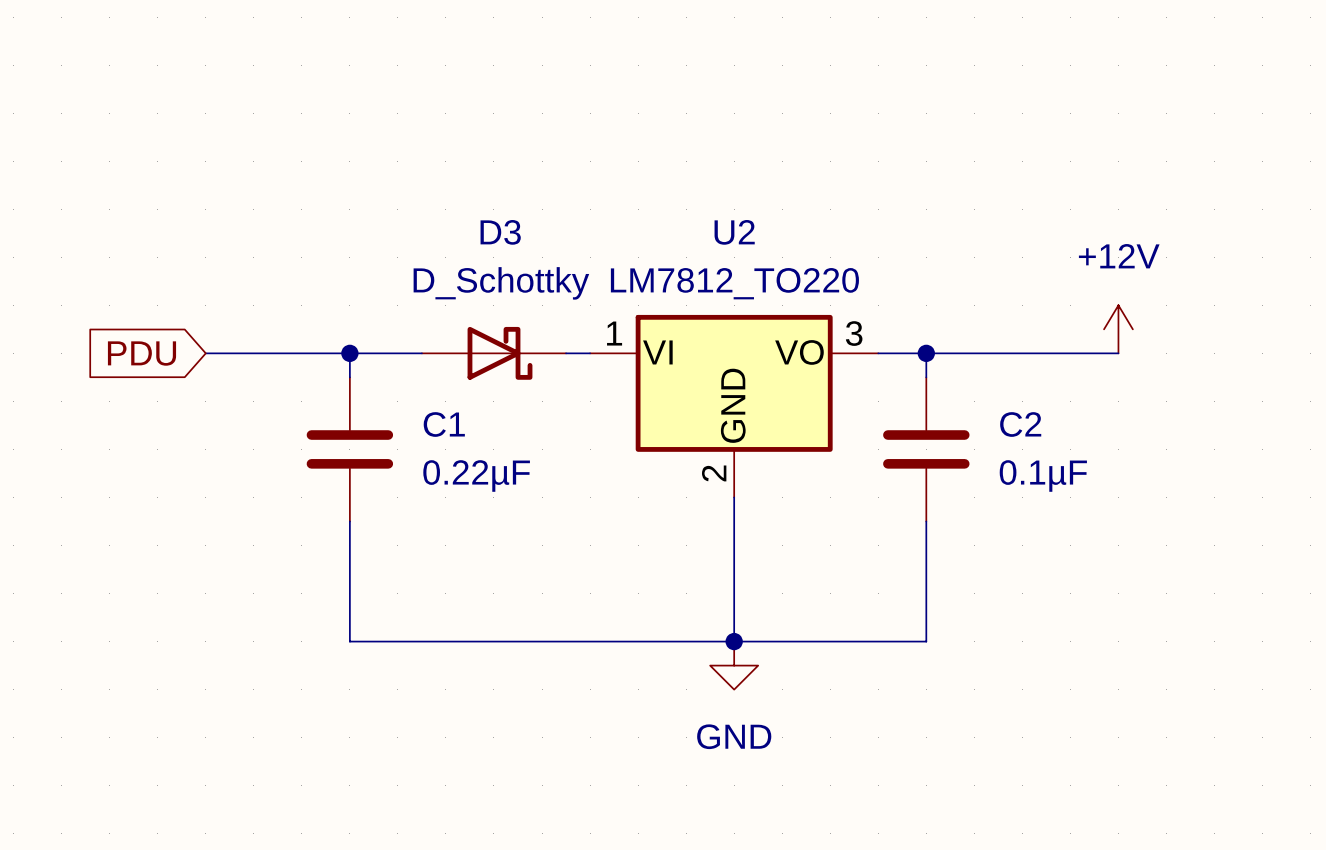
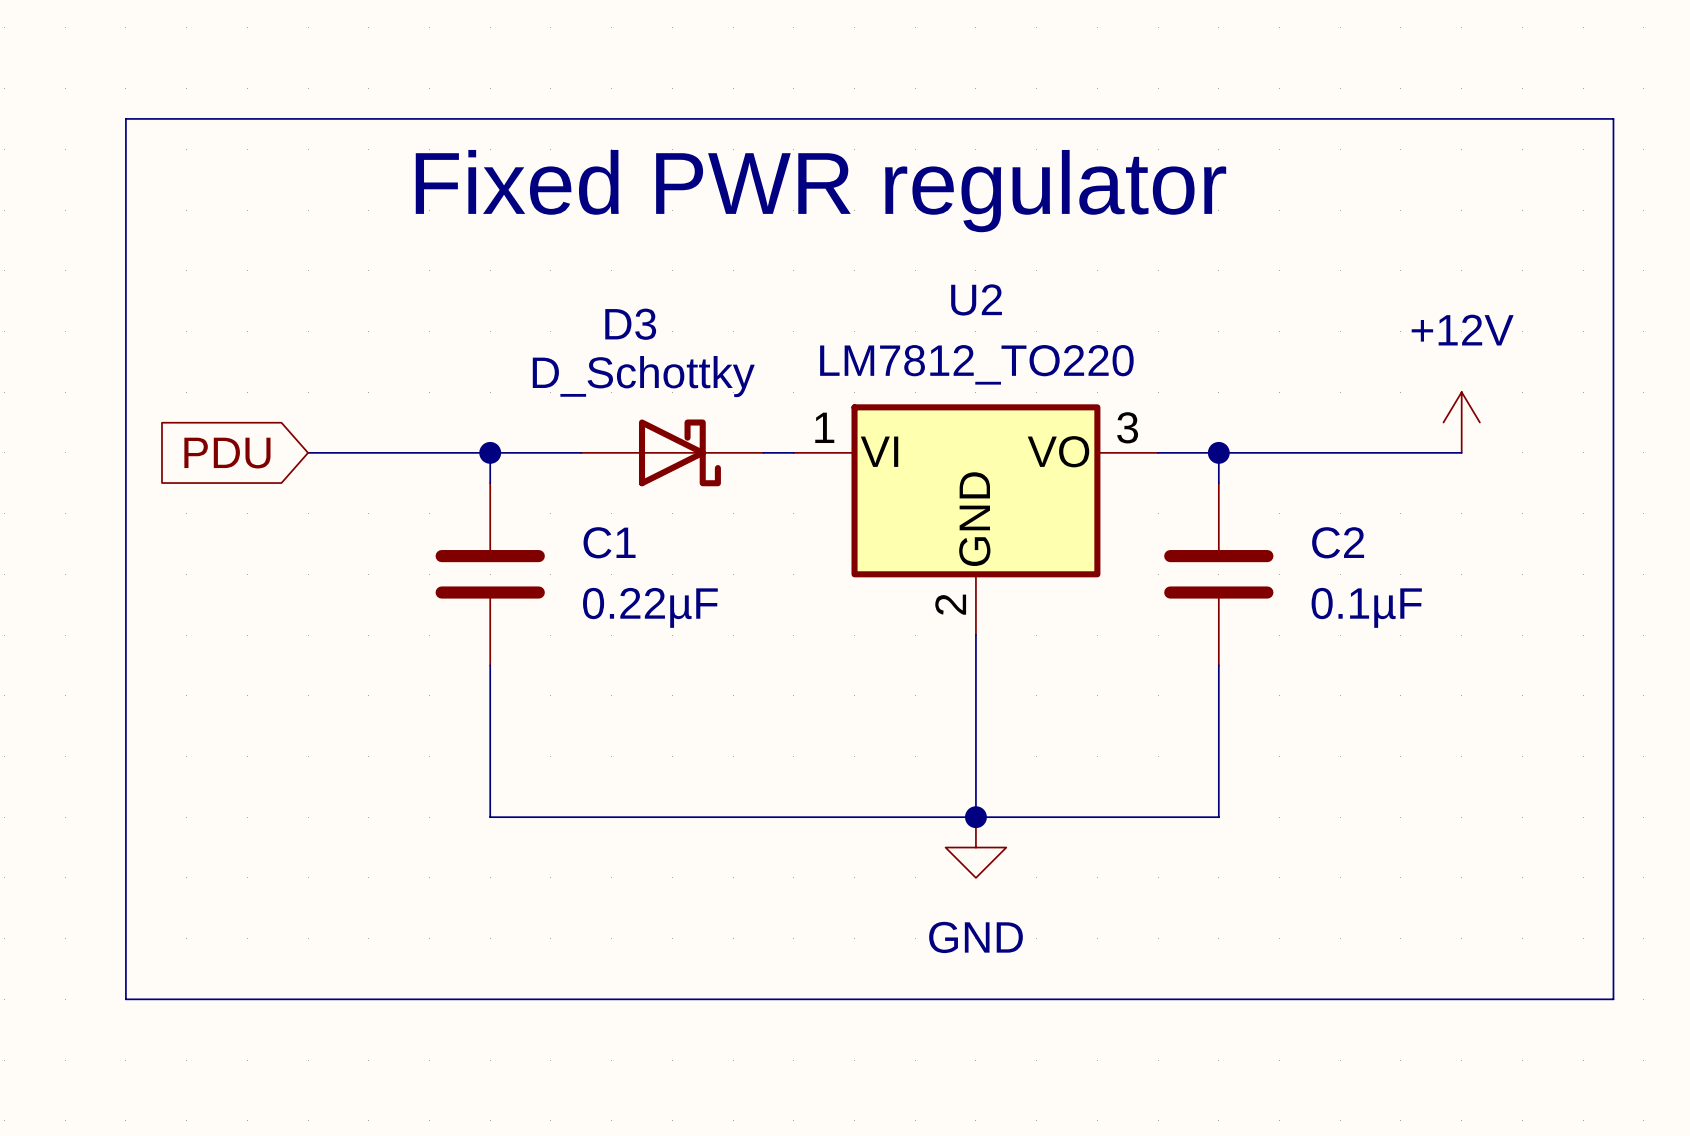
line: none -> (125, 118) (1613, 118) (1613, 999) (125, 999) (125, 118)
text: none -> Fixed PWR regulator (820, 191)
D3 name position: D3 (500, 232) -> D3 (630, 324)
D3 value position: D_Schottky (501, 283) -> D_Schottky (643, 376)

